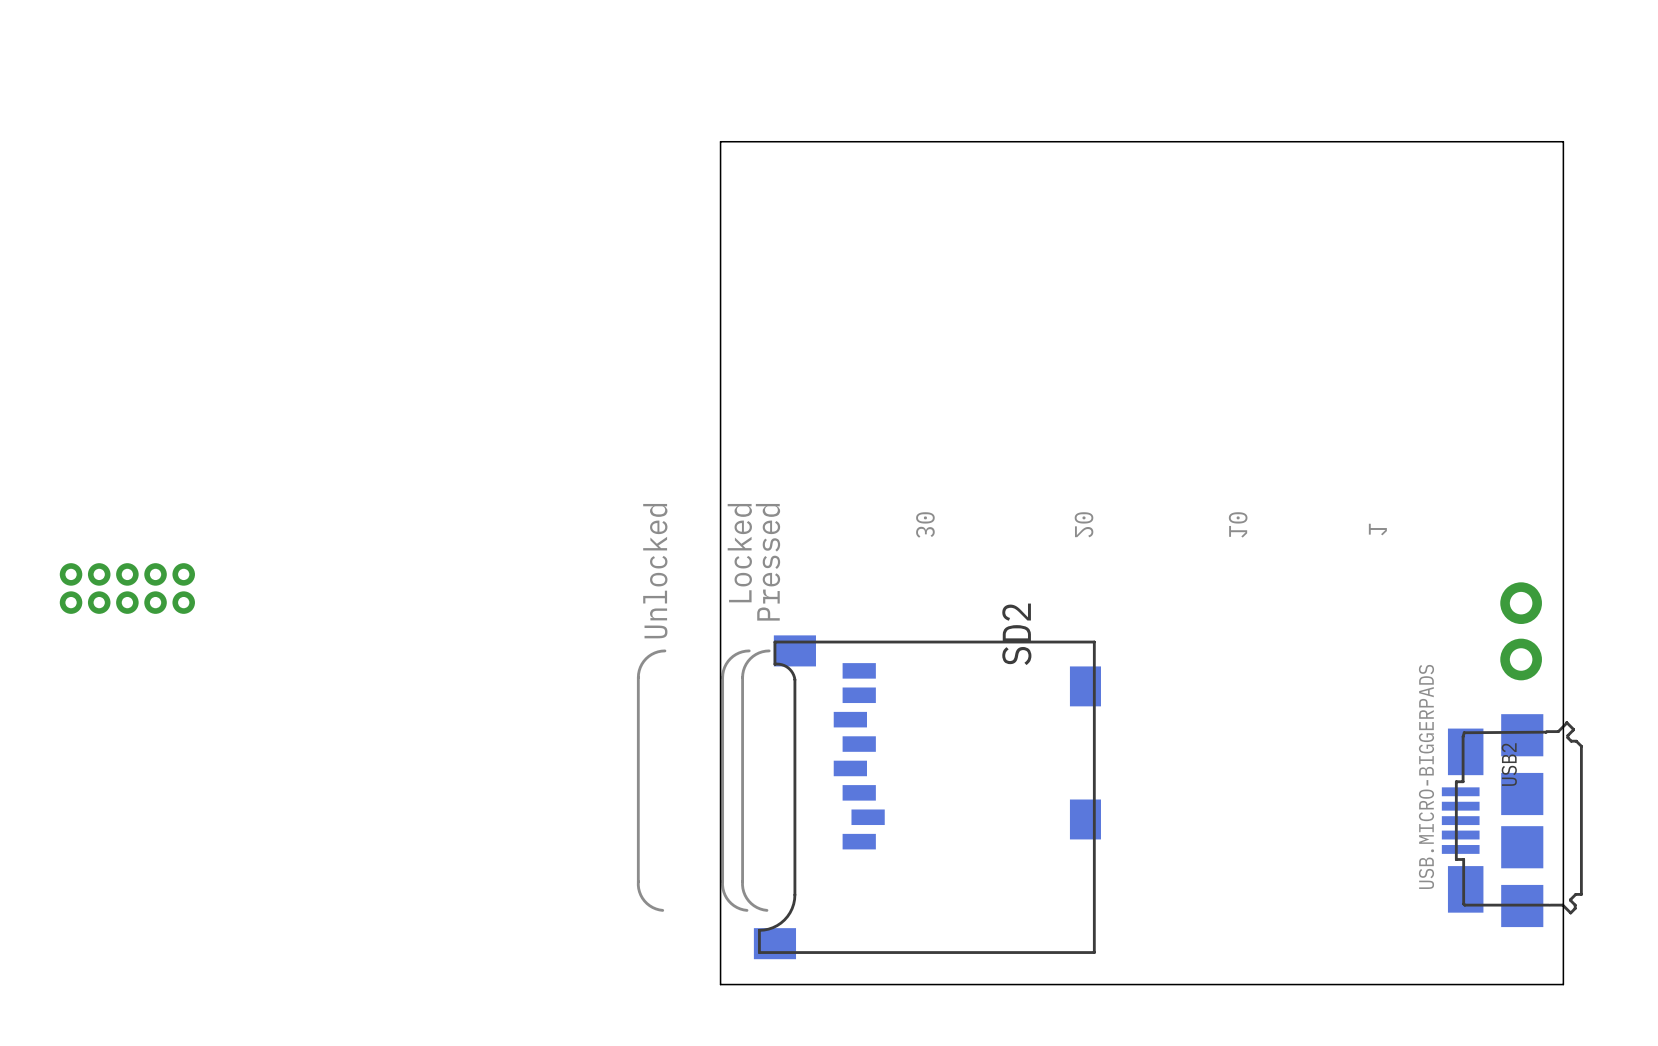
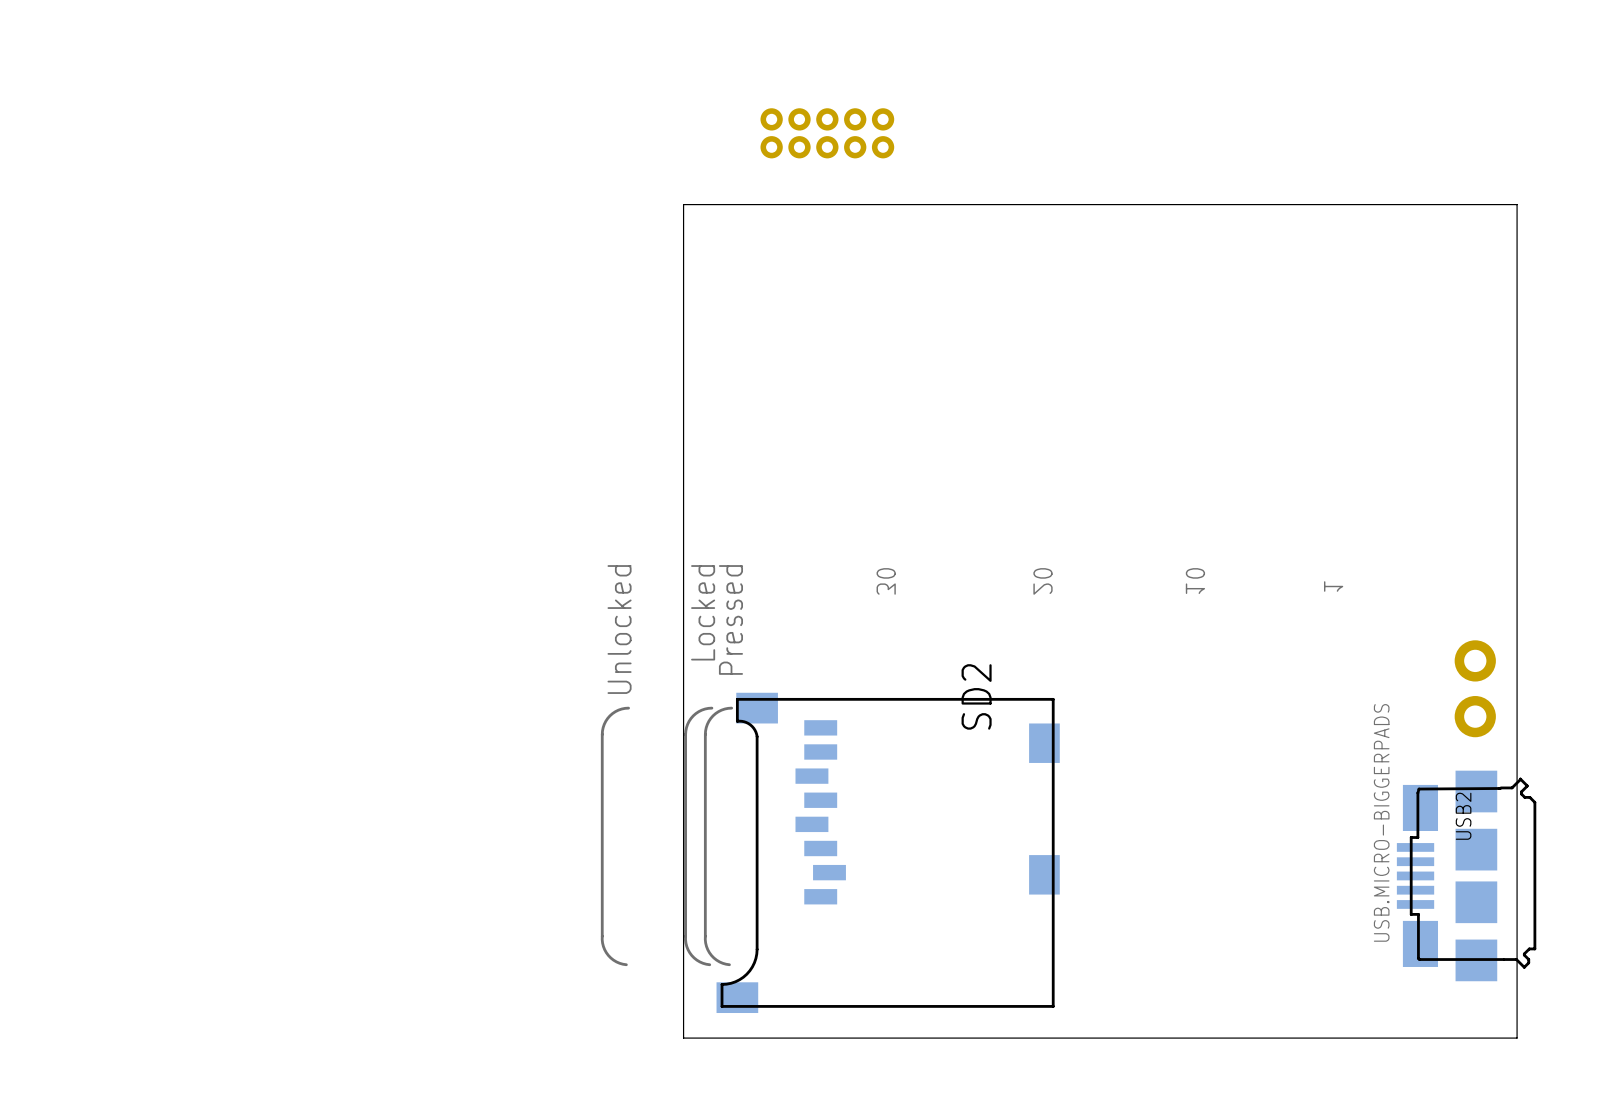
part: none -> (827, 133)
part: (127, 588) -> none

